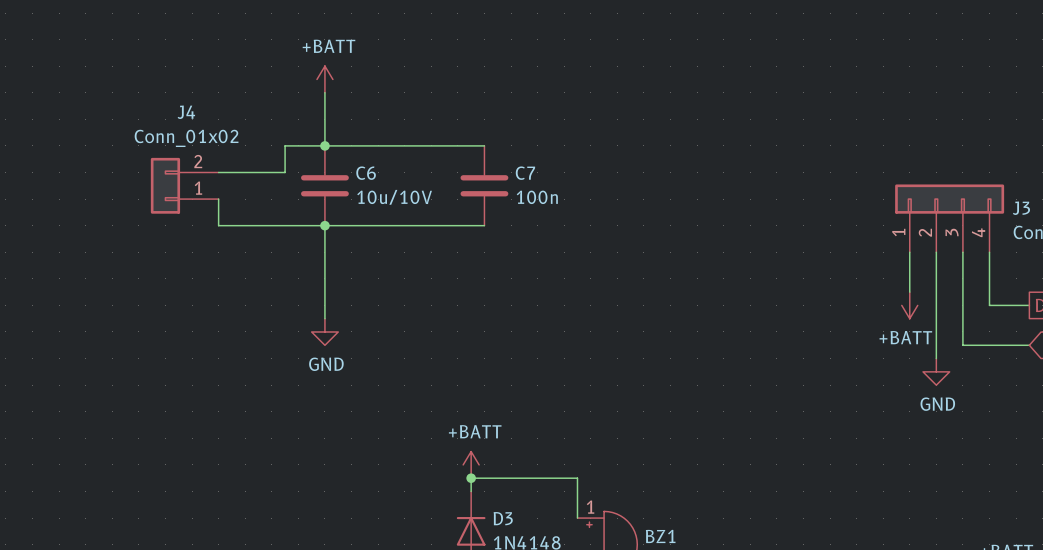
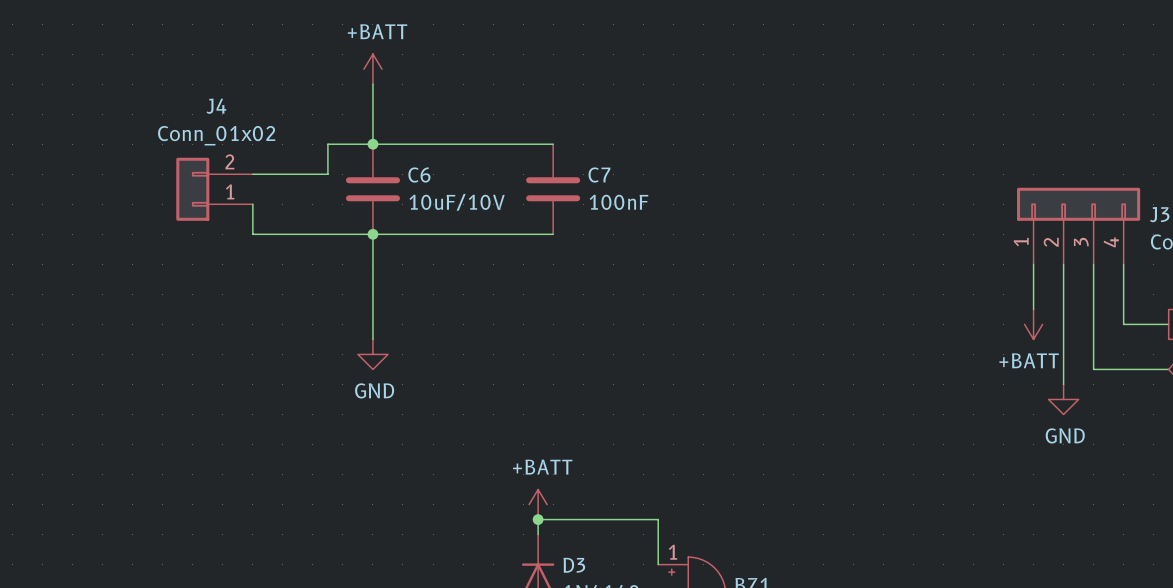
C6 value: 10u/10V (394, 197) -> 10uF/10V (457, 202)
C7 value: 100n (537, 197) -> 100nF (618, 202)

